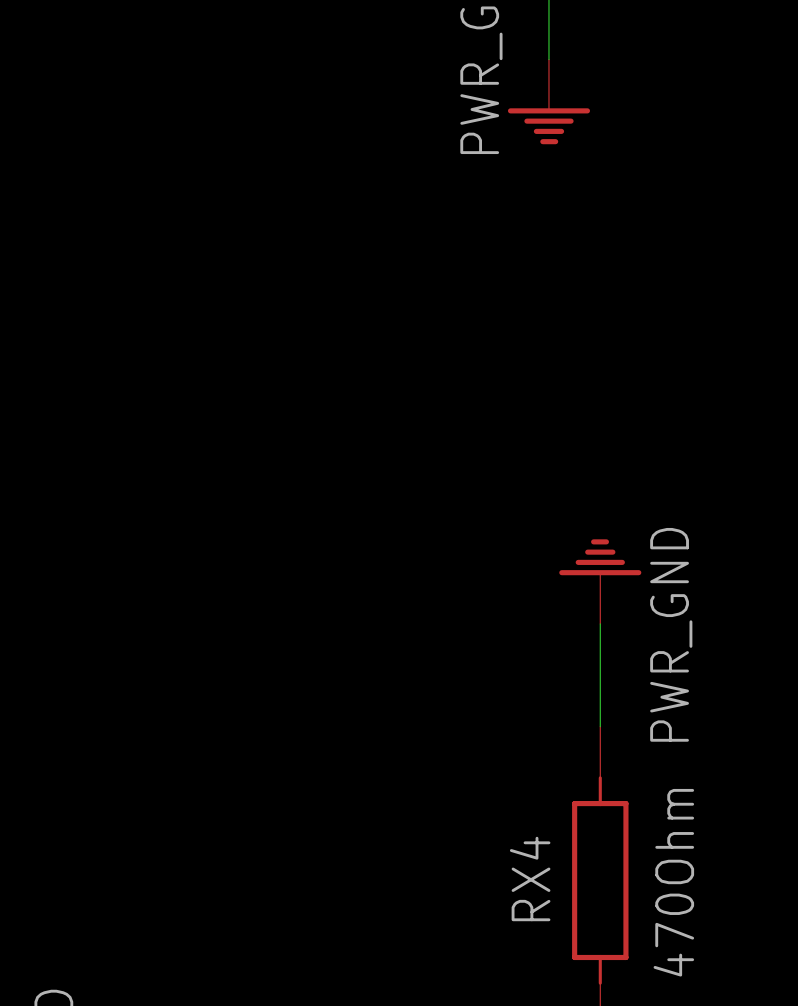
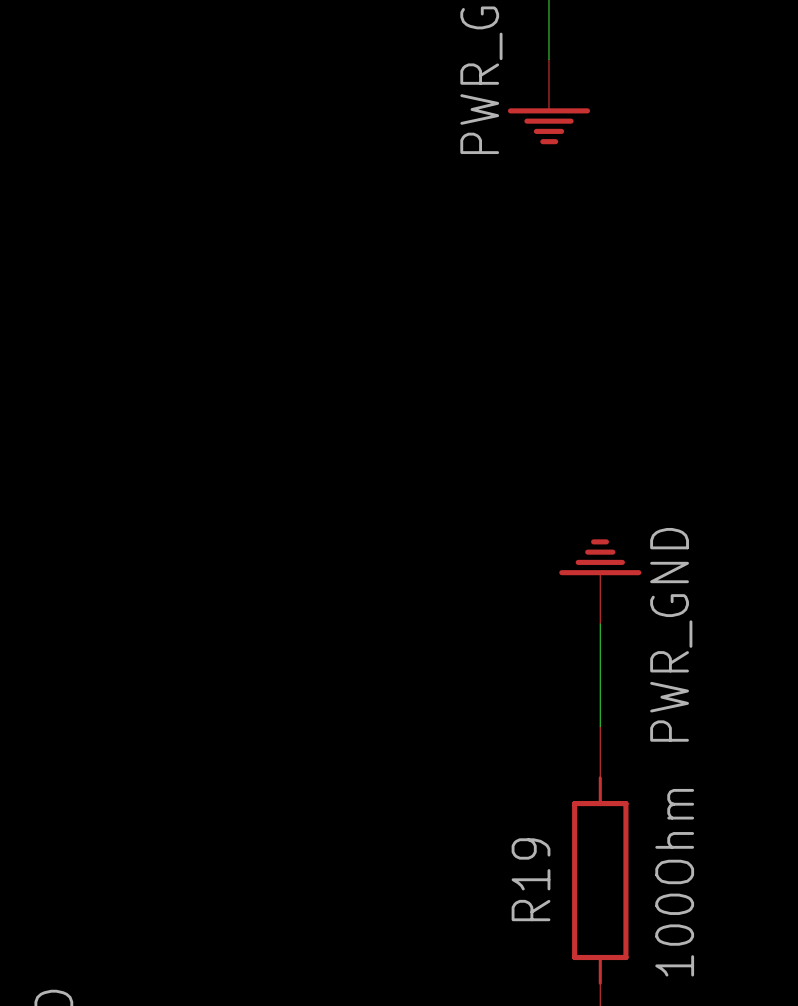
RX4 name: RX4 (530, 878) -> R19 (531, 879)
RX4 value: 470Ohm (673, 882) -> 100Ohm (674, 882)

